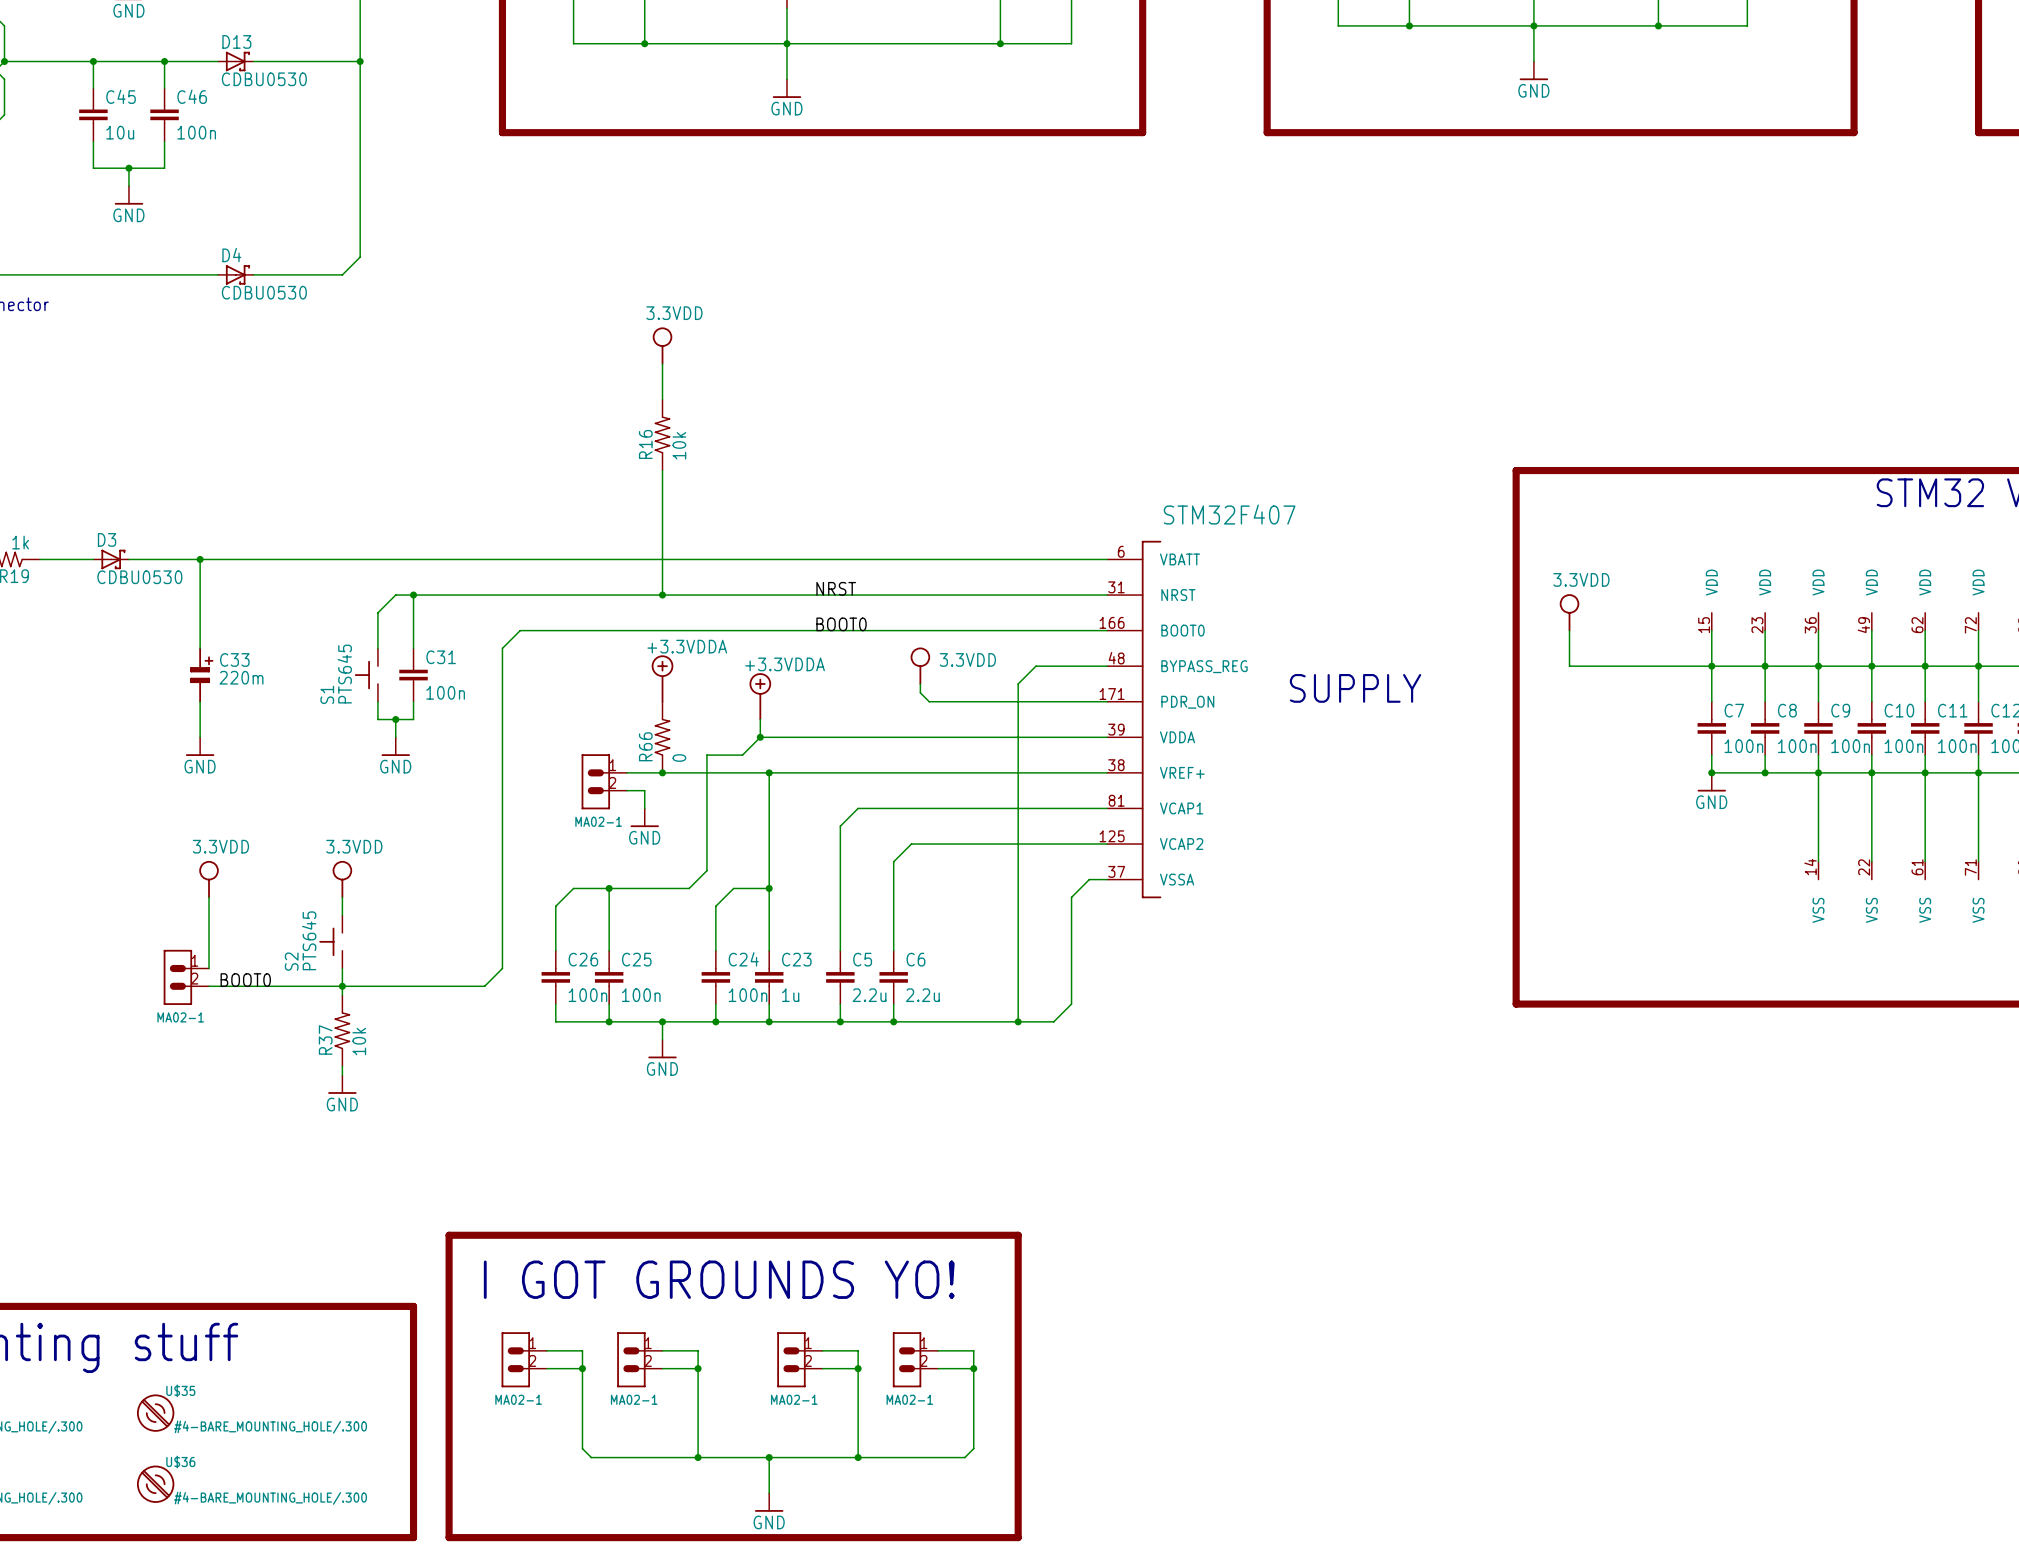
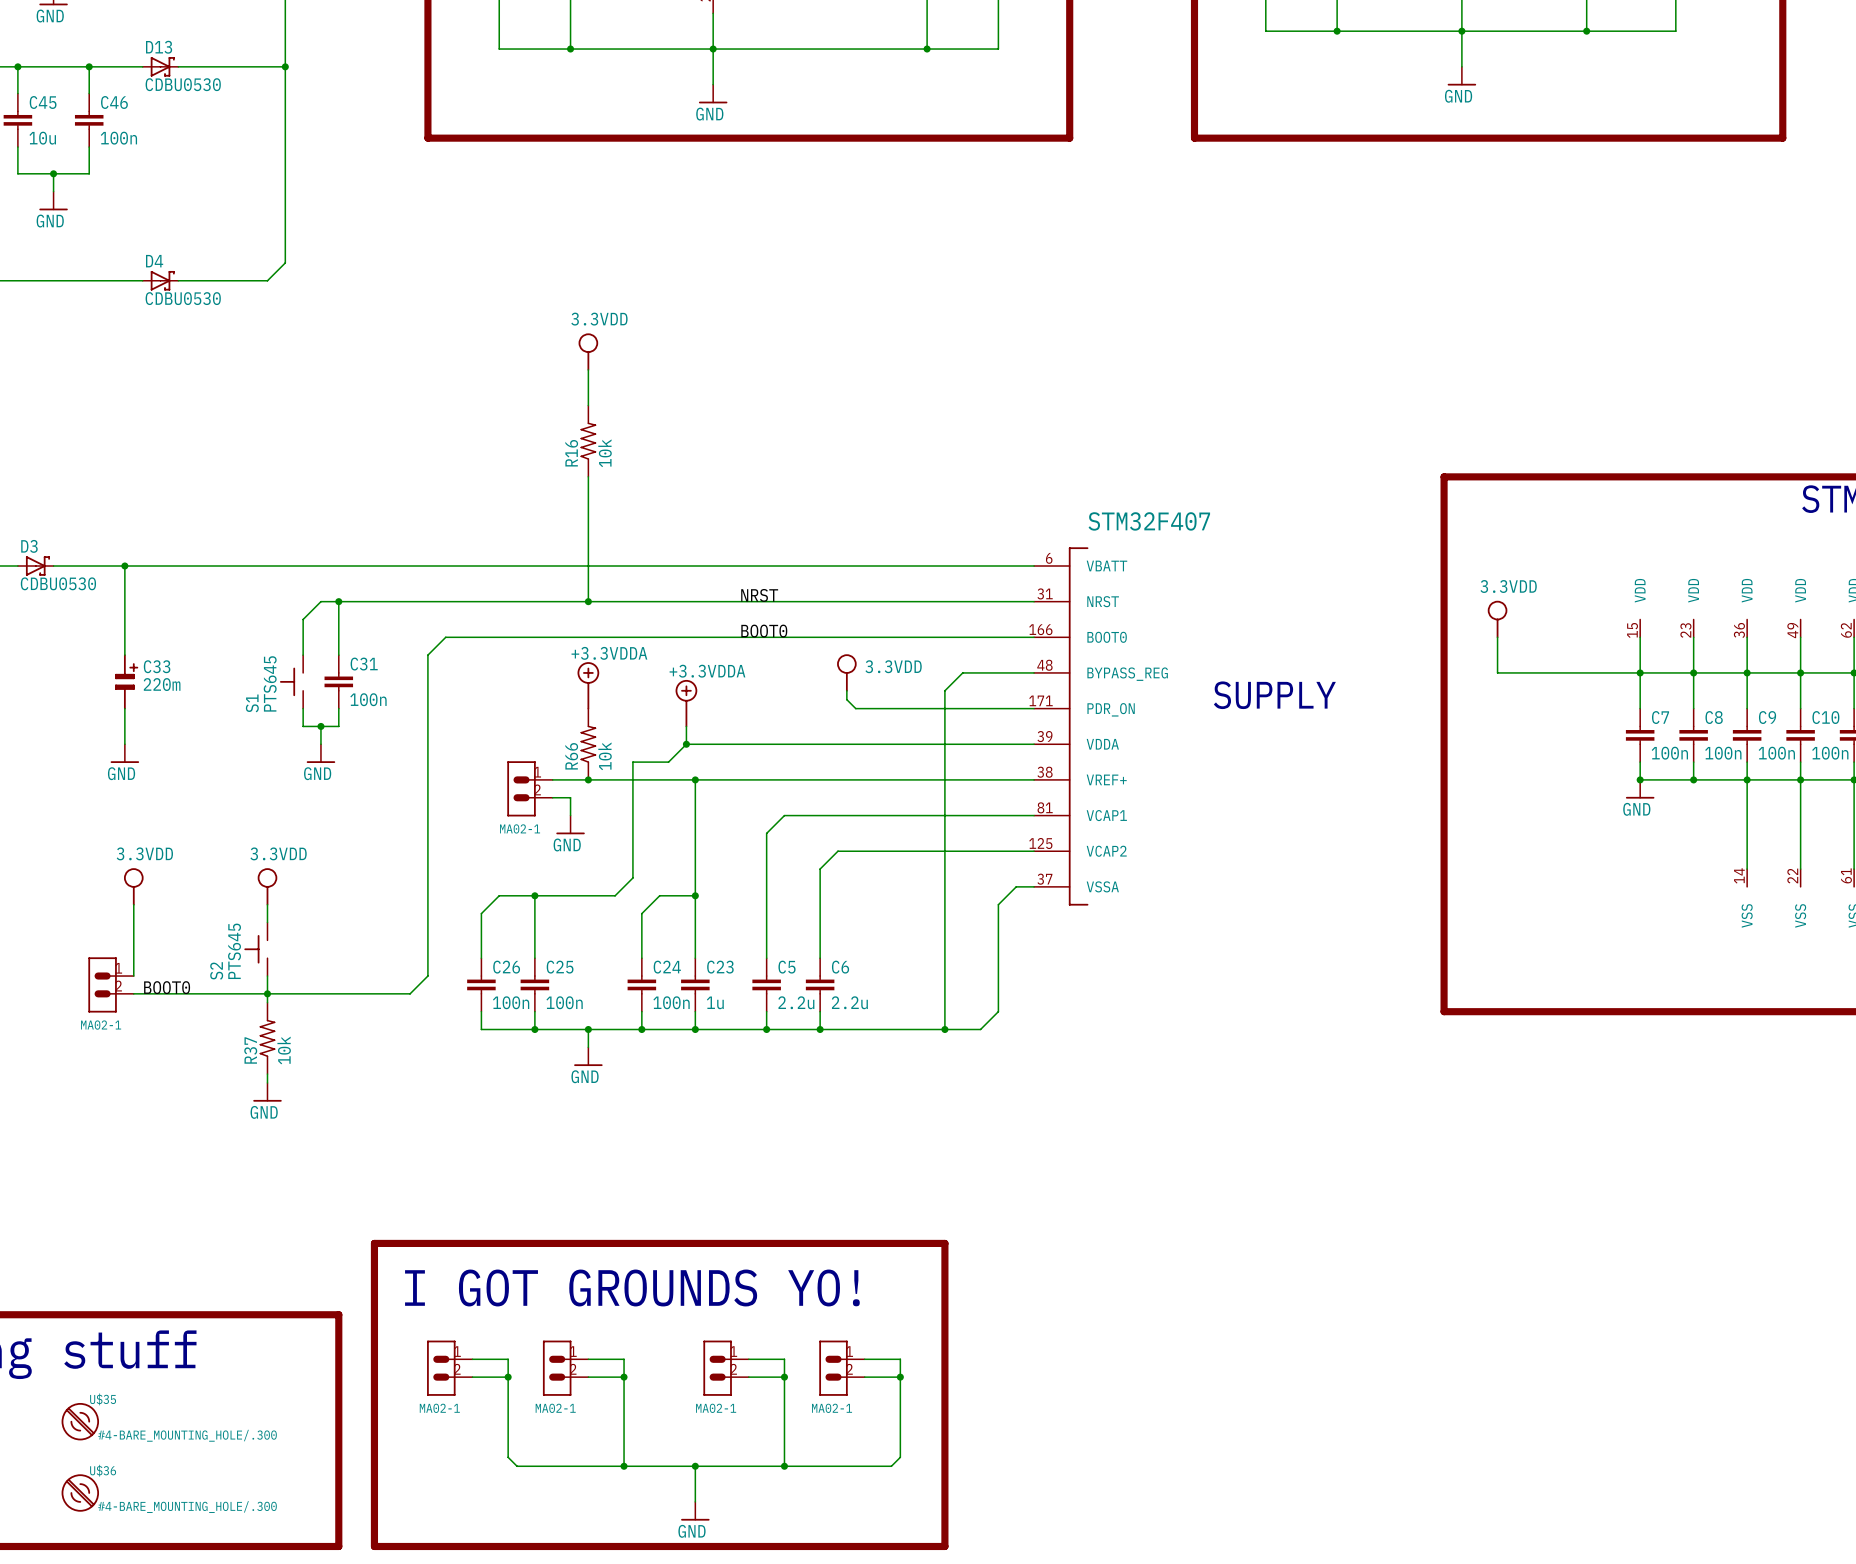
R66 value: 0 (679, 757) -> 10k (605, 756)

